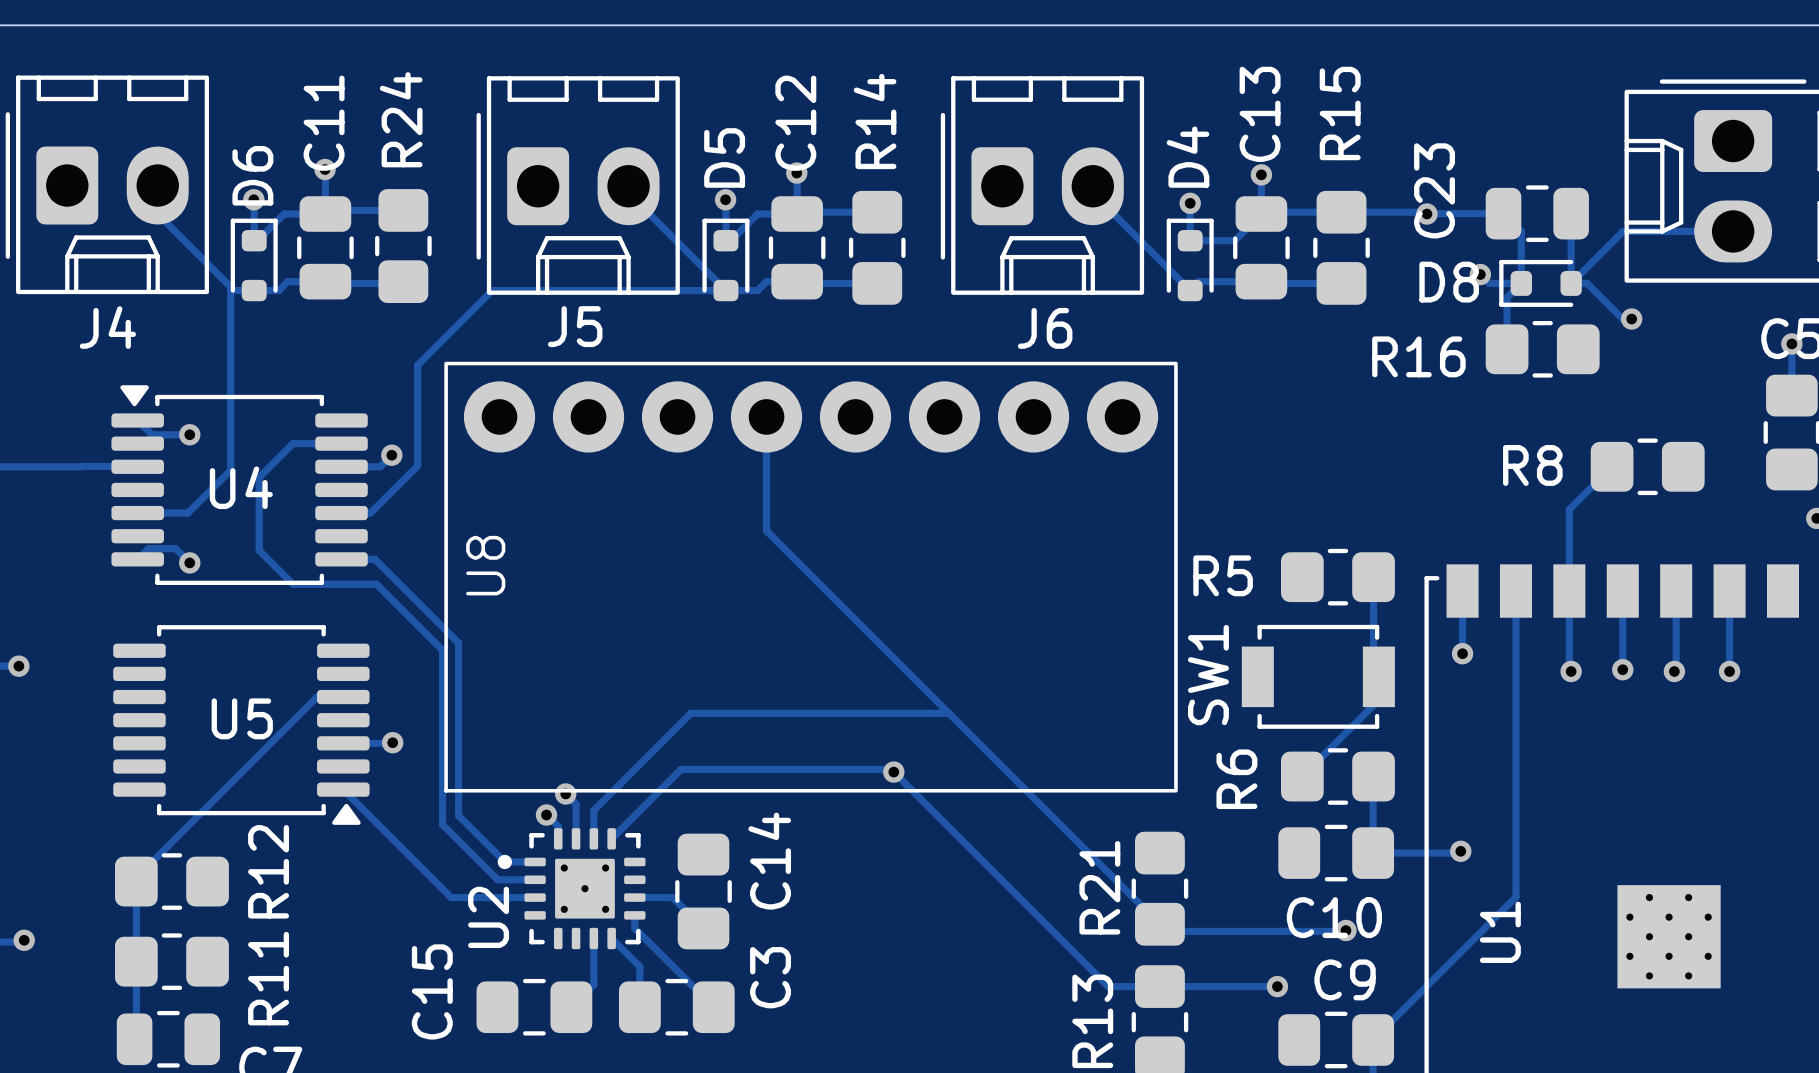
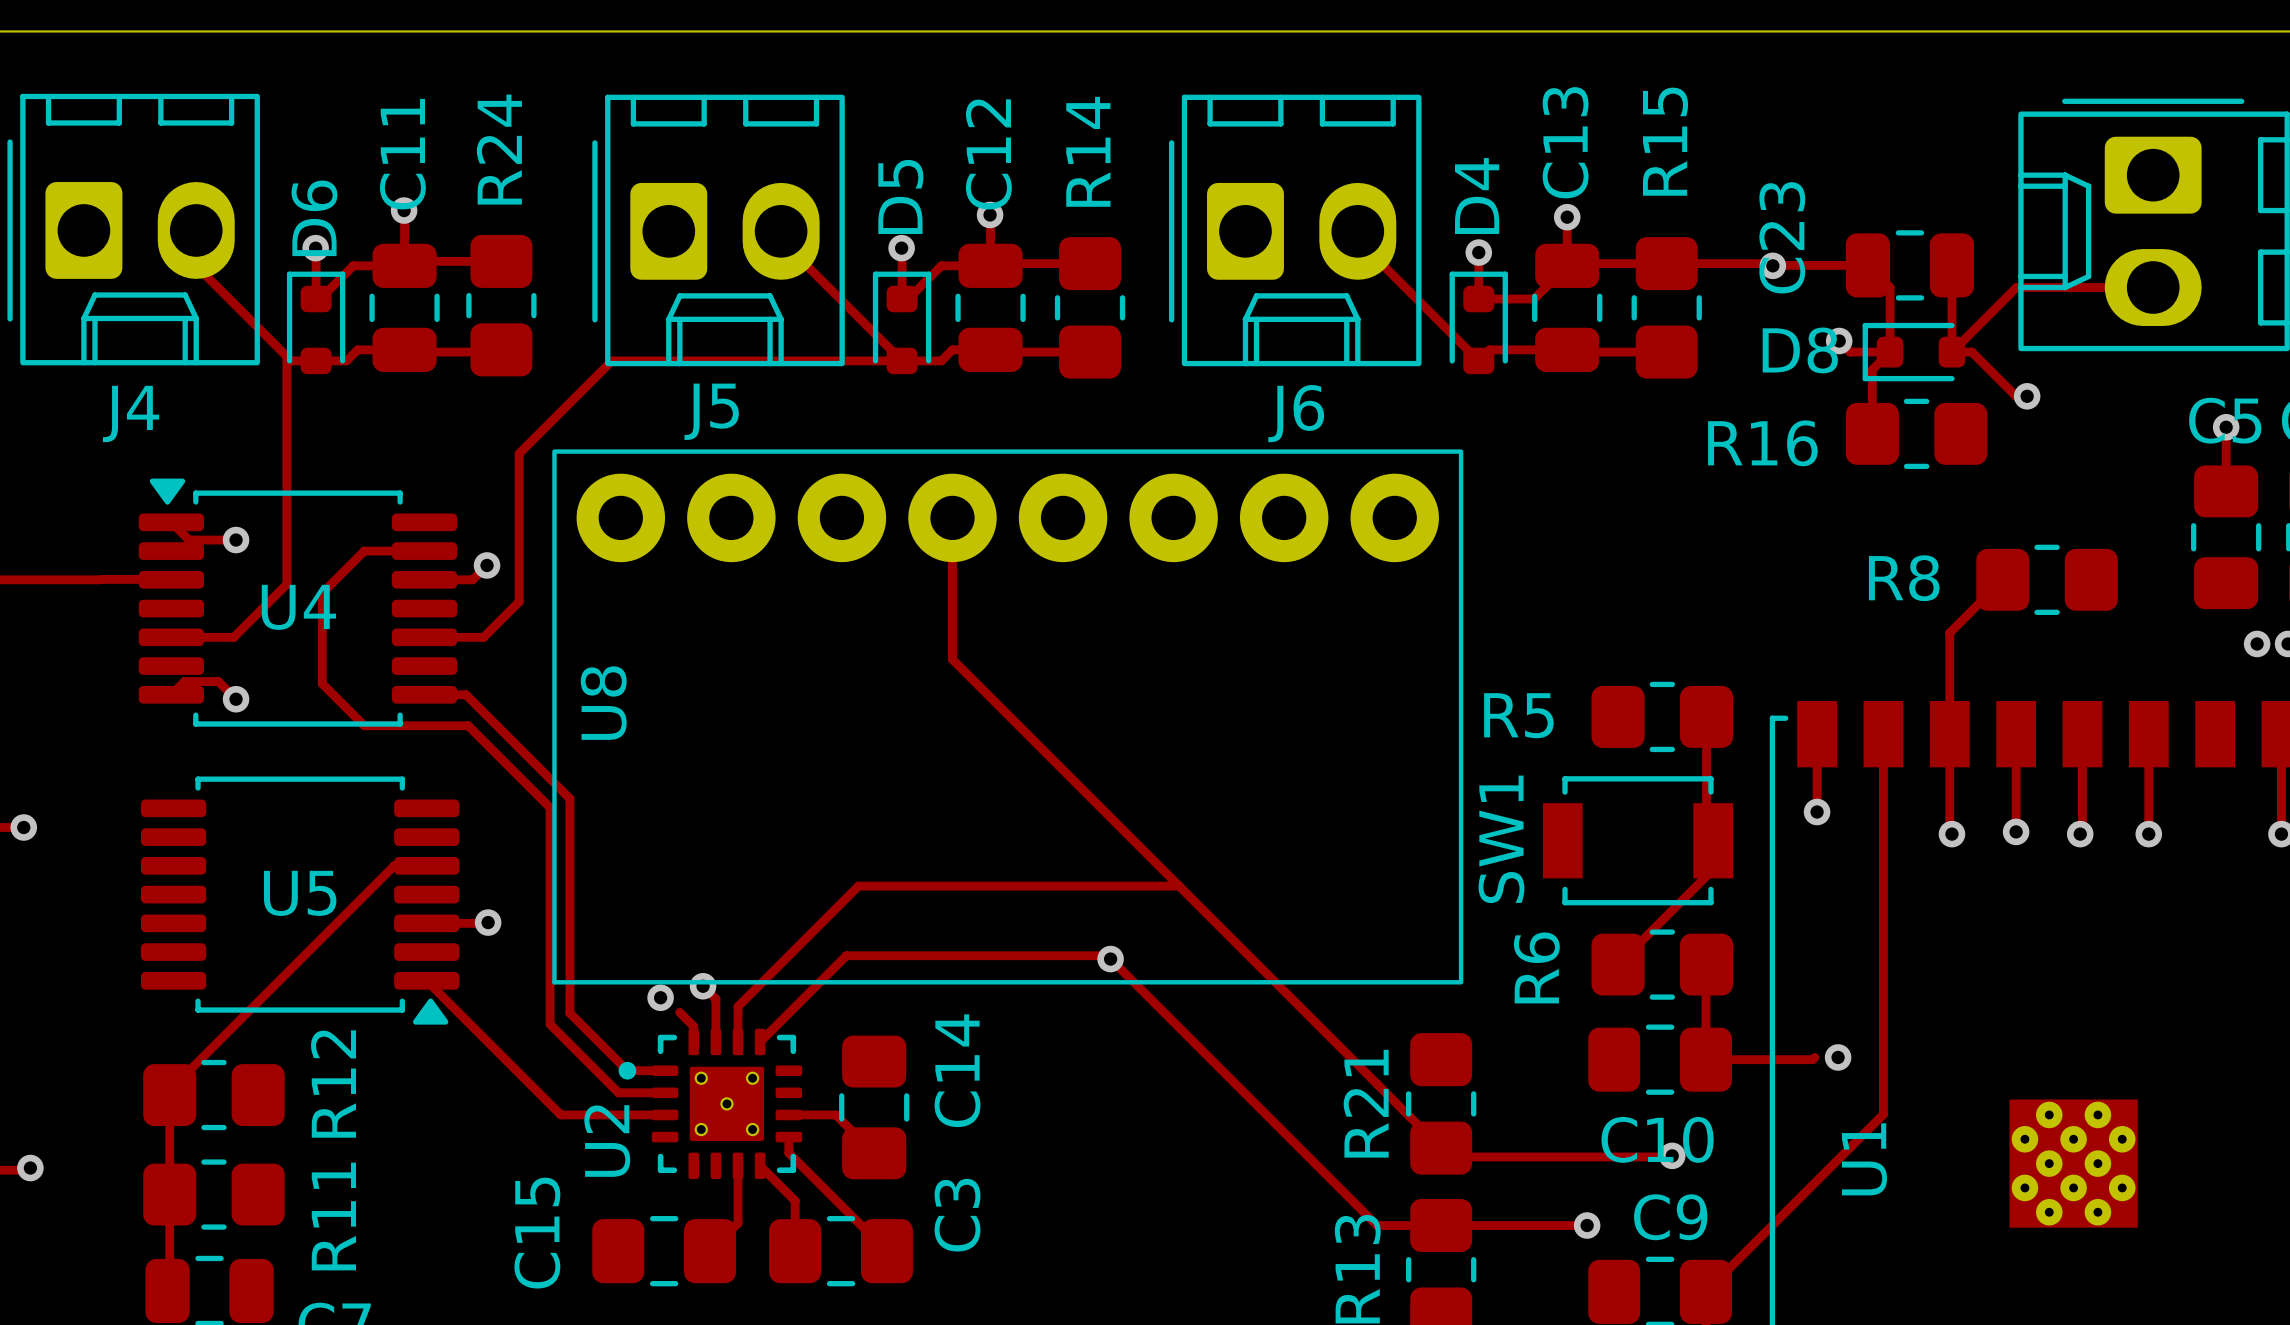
track: (417, 465) (370, 513) -> (519, 578) (519, 601) (483, 637) (460, 637)
via position: (546, 814) -> (660, 997)
via position: (1460, 851) -> (1838, 1057)

